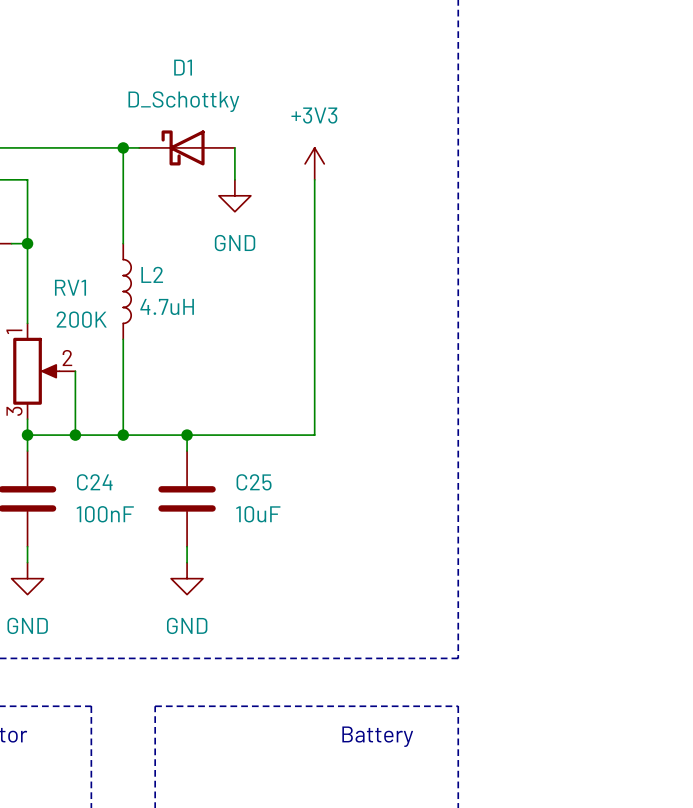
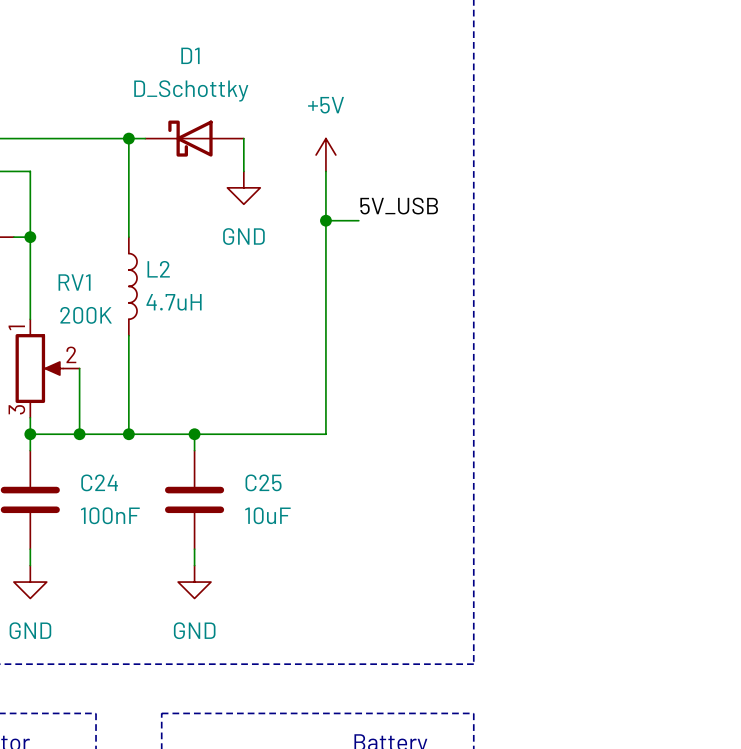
power symbol: +3V3 (314, 163) -> +5V (325, 155)
label: none -> 5V_USB (399, 206)
wire: none -> (325, 220) (358, 220)
junction: none -> (325, 220)

